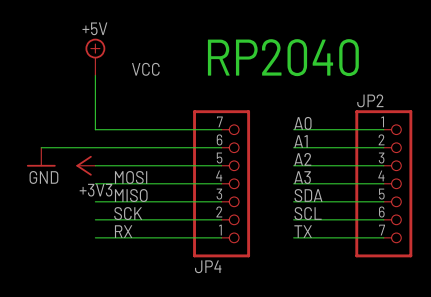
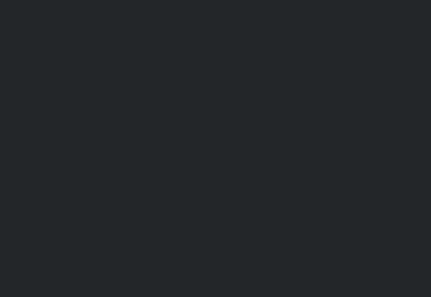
power symbol: +5V (95, 57) -> none
text: RP2040 (283, 57) -> none
label: VCC (145, 69) -> none
wire: (95, 75) (95, 129) (221, 129) -> none
label: A0 (302, 123) -> none
wire: (293, 129) (383, 129) -> none
label: A1 (300, 141) -> none
wire: (41, 147) (221, 147) -> none
wire: (293, 147) (383, 147) -> none
power symbol: GND (41, 157) -> none
label: A2 (302, 159) -> none
power symbol: +3V3 (85, 165) -> none
wire: (95, 165) (221, 165) -> none
wire: (293, 165) (383, 165) -> none
label: MOSI (131, 177) -> none
label: A3 (302, 177) -> none
wire: (95, 183) (221, 183) -> none
JP4: (221, 183) -> none
wire: (293, 183) (383, 183) -> none
JP2: (383, 183) -> none
label: MISO (131, 195) -> none
label: SDA (308, 195) -> none
wire: (95, 201) (221, 201) -> none
wire: (293, 201) (383, 201) -> none
label: SCK (128, 213) -> none
label: SCL (308, 213) -> none
wire: (95, 219) (221, 219) -> none
wire: (293, 219) (383, 219) -> none
label: RX (123, 231) -> none
label: TX (303, 231) -> none
wire: (95, 237) (221, 237) -> none
wire: (293, 237) (383, 237) -> none

